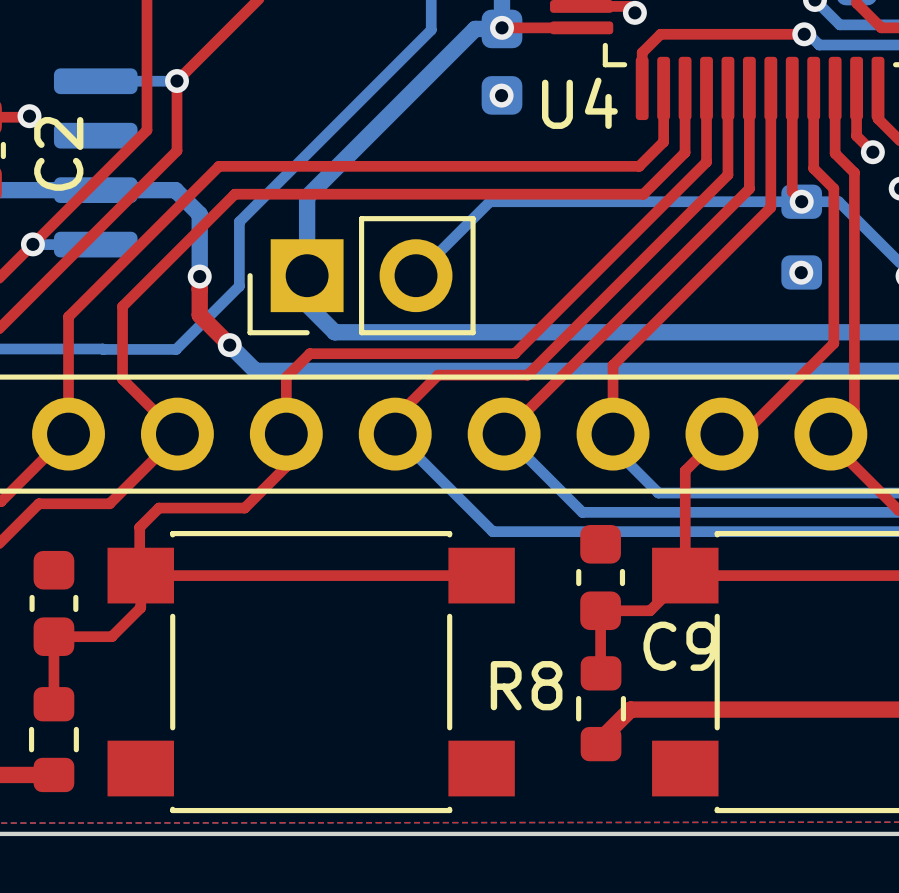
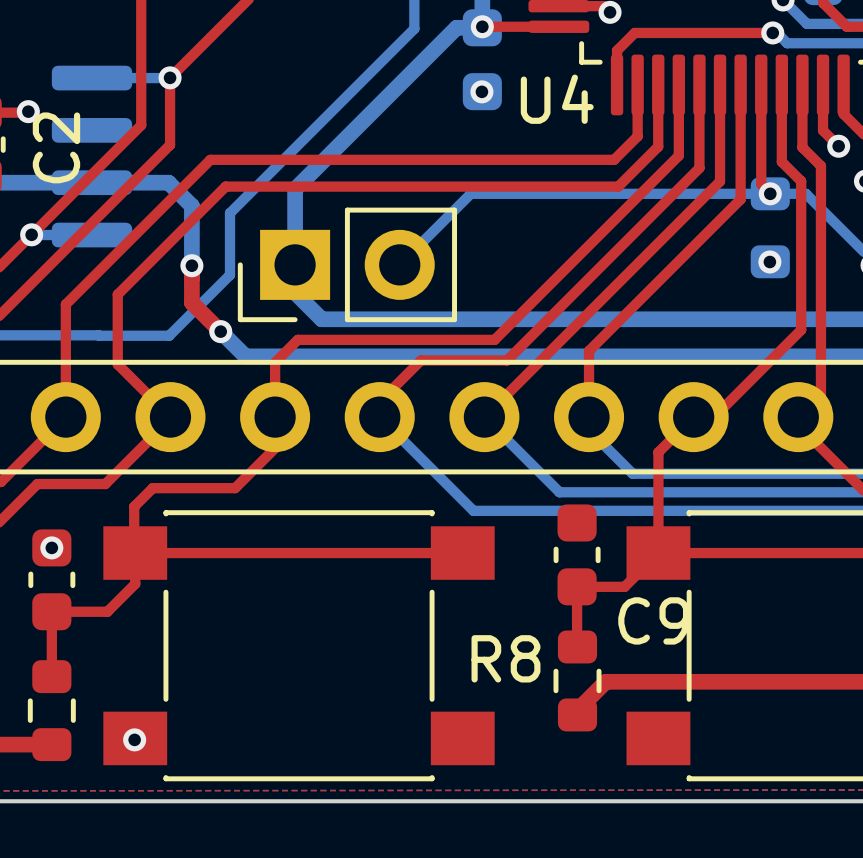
via: none -> (51, 547)
via: none -> (134, 739)

